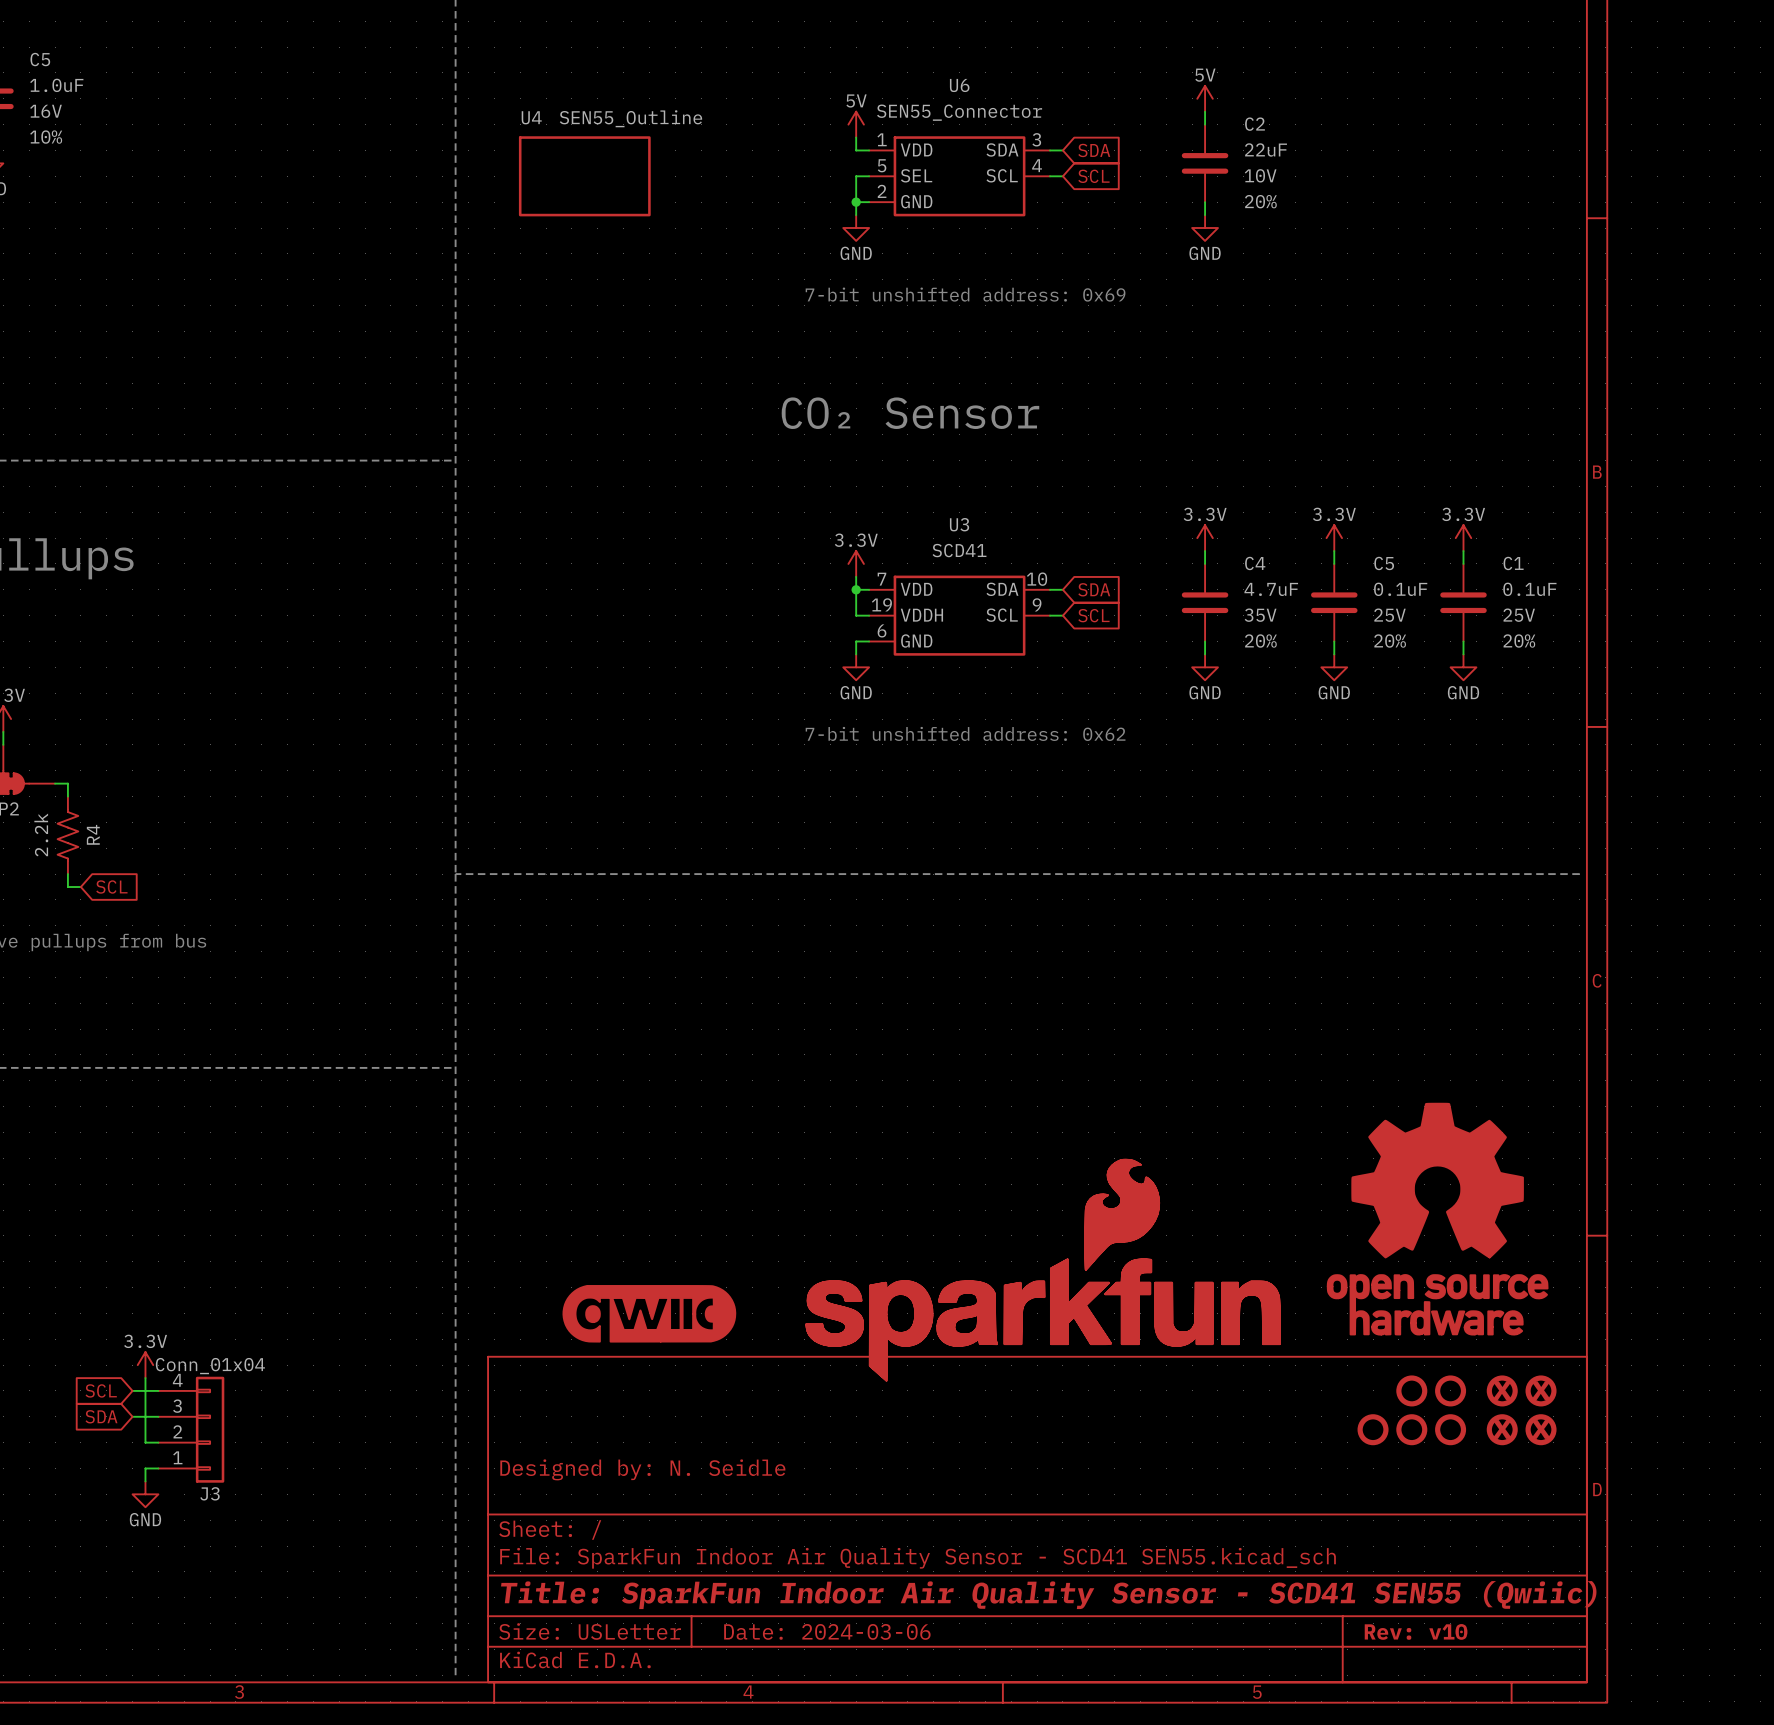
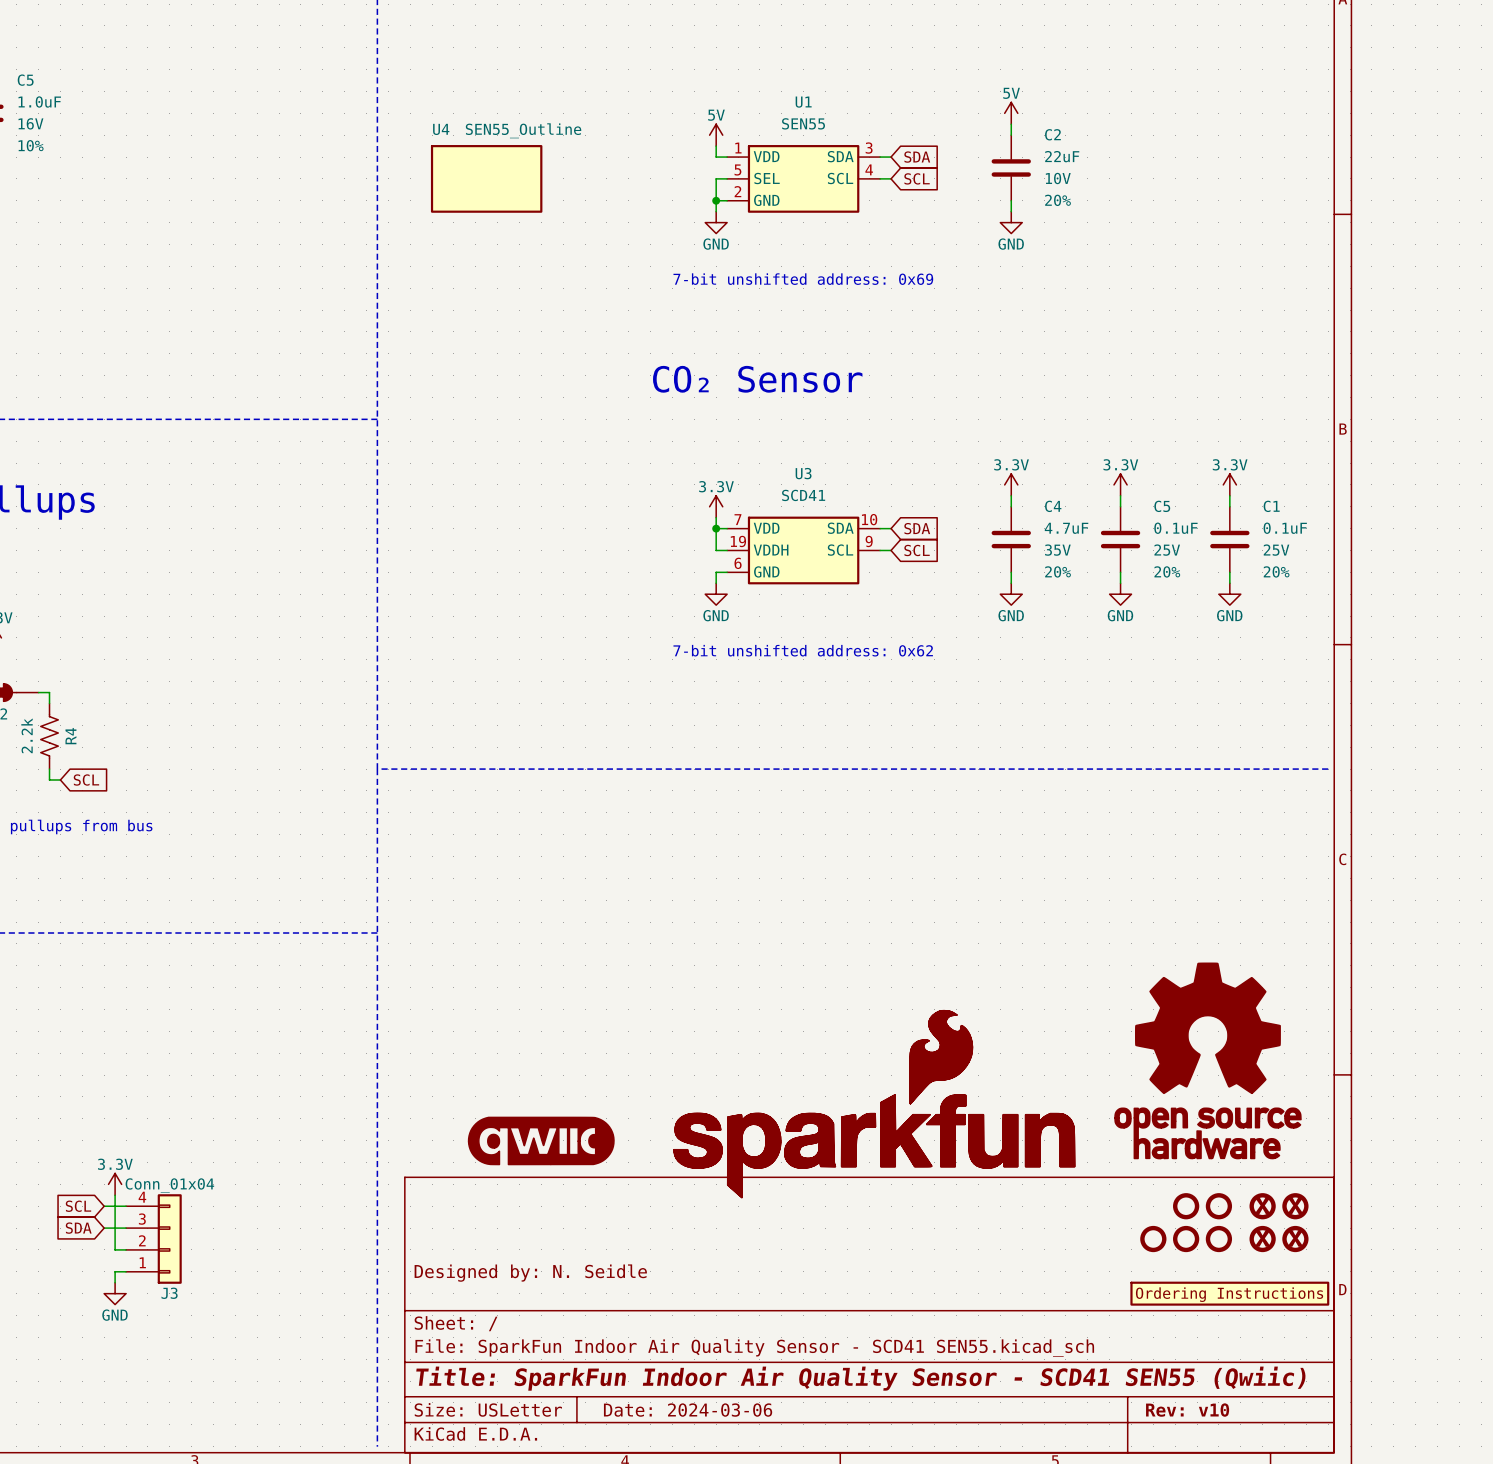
U6 name: U6 (959, 85) -> U1 (803, 102)
U6 value: SEN55_Connector (959, 112) -> SEN55 (803, 123)
part: none -> (1229, 1293)

